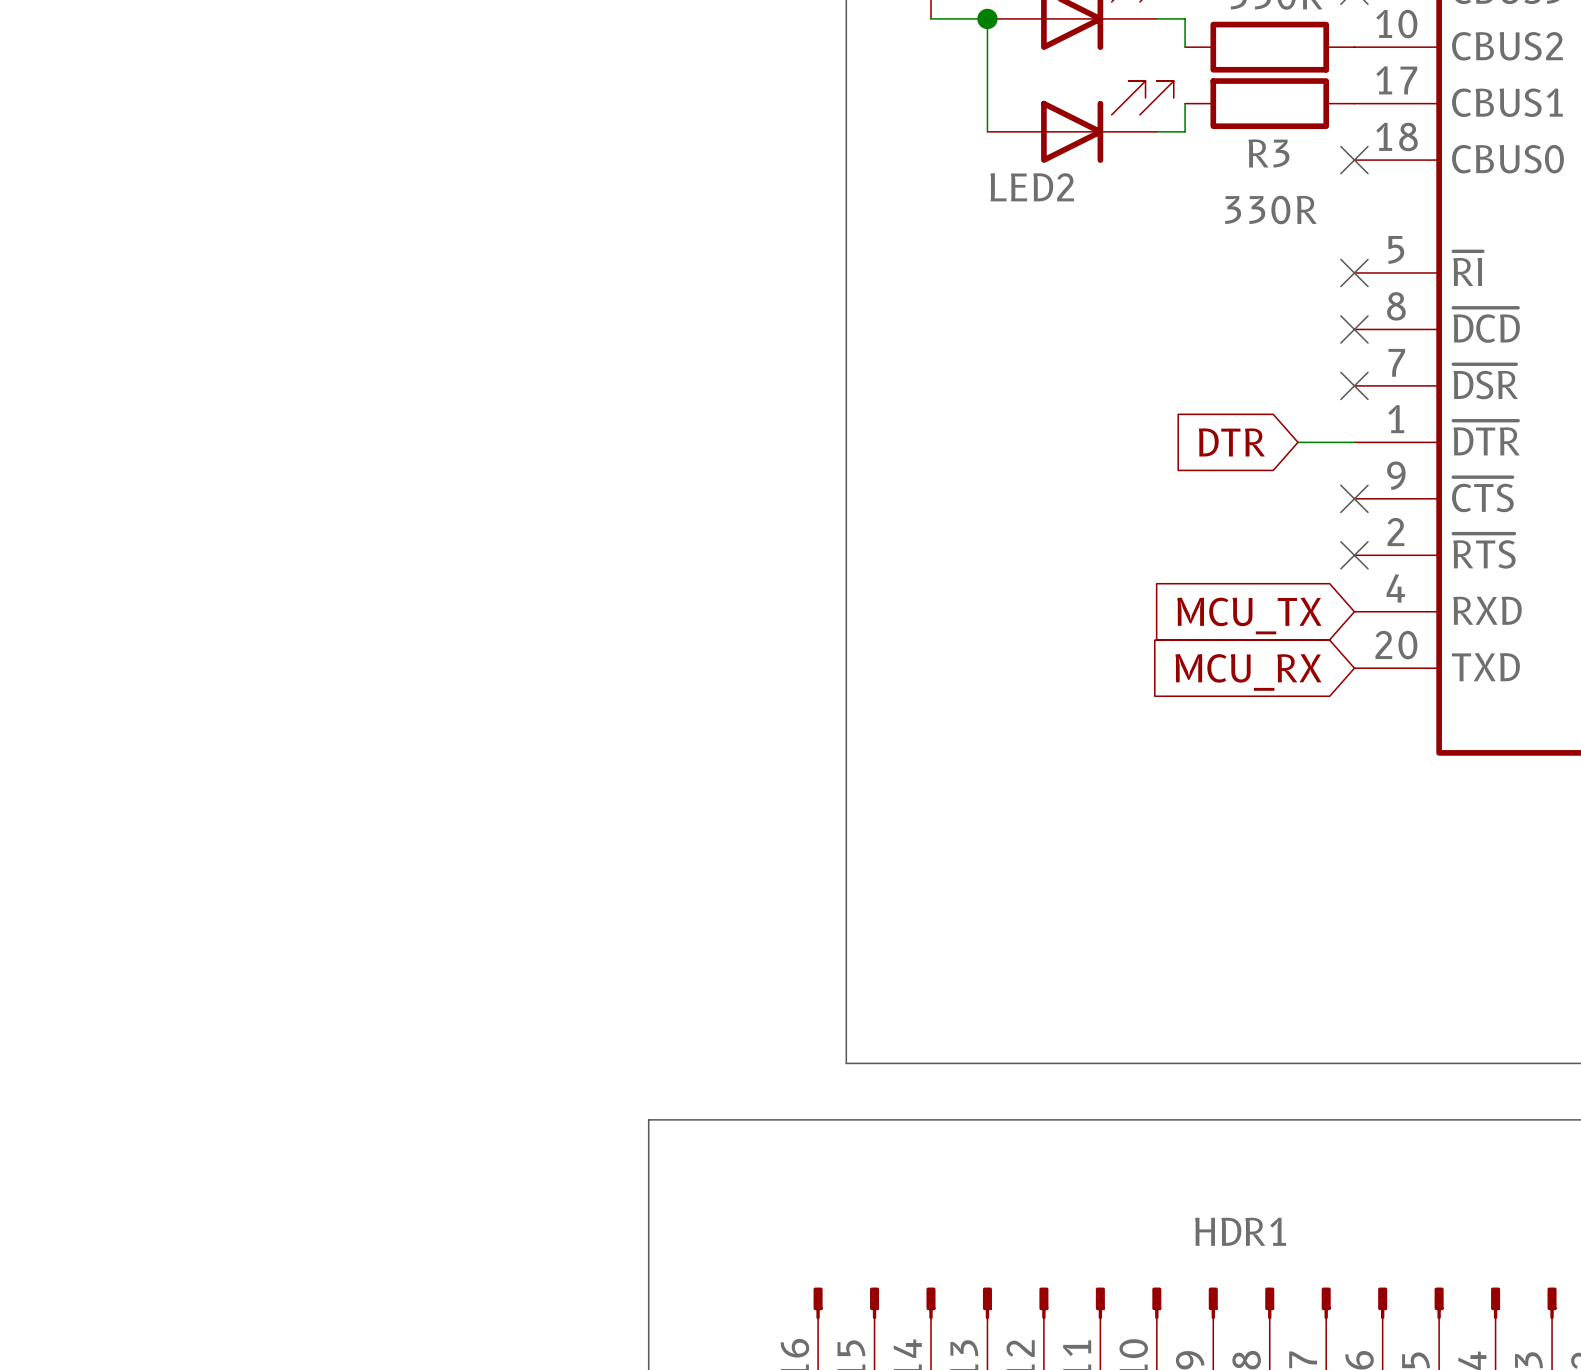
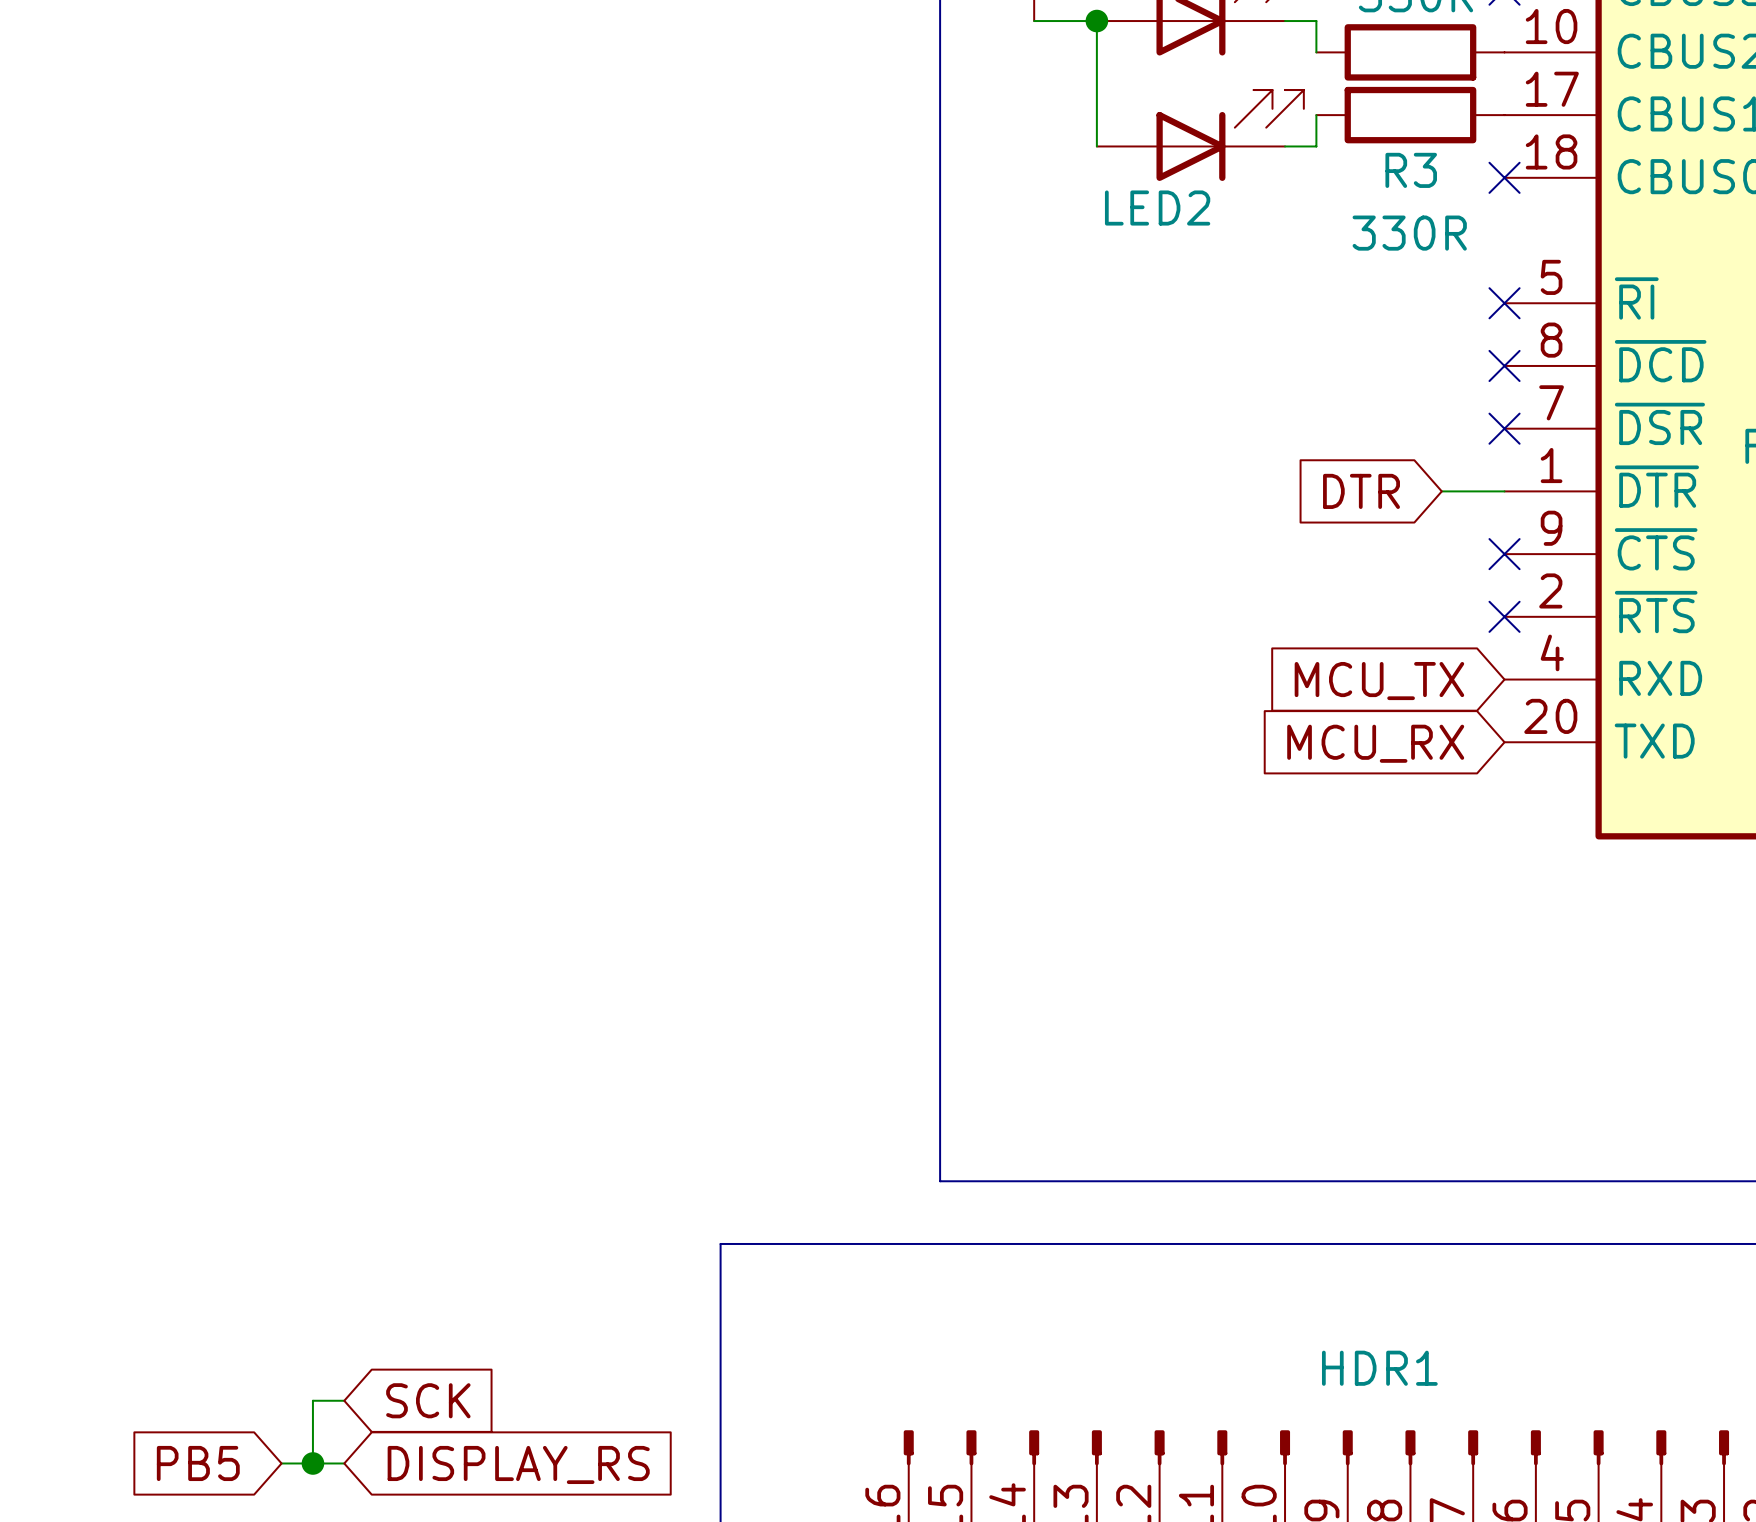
wire: none -> (344, 1400) (312, 1400) (312, 1463)
global label: none -> SCK (428, 1400)
global label: none -> PB5 (198, 1463)
wire: none -> (281, 1463) (344, 1463)
junction: none -> (312, 1463)
global label: none -> DISPLAY_RS (518, 1464)

